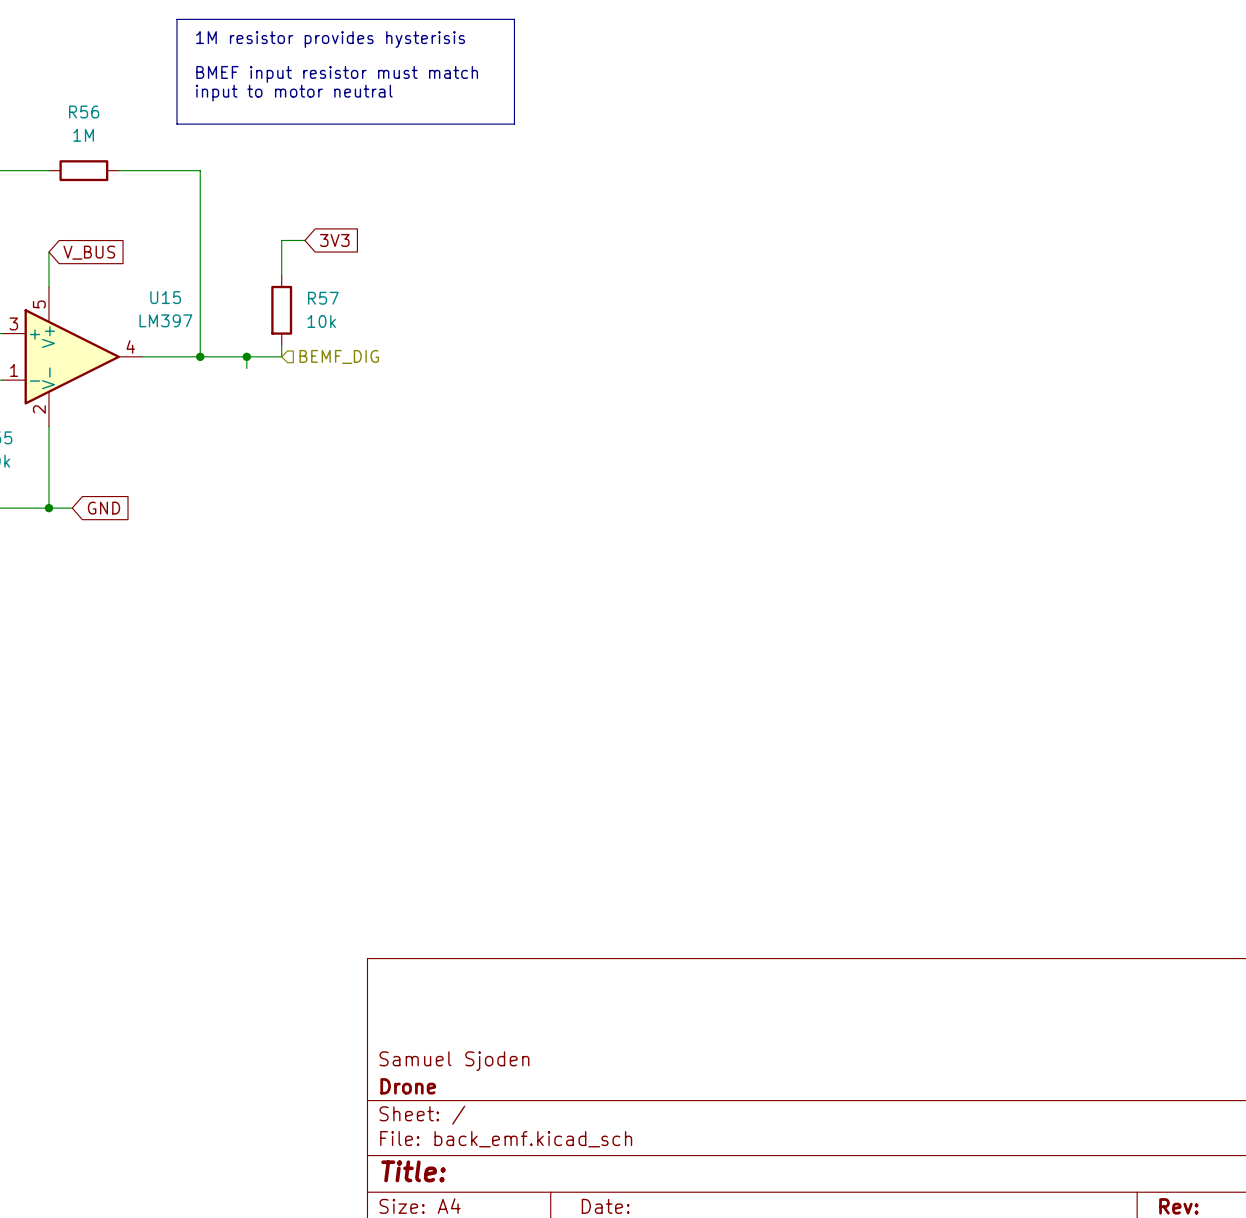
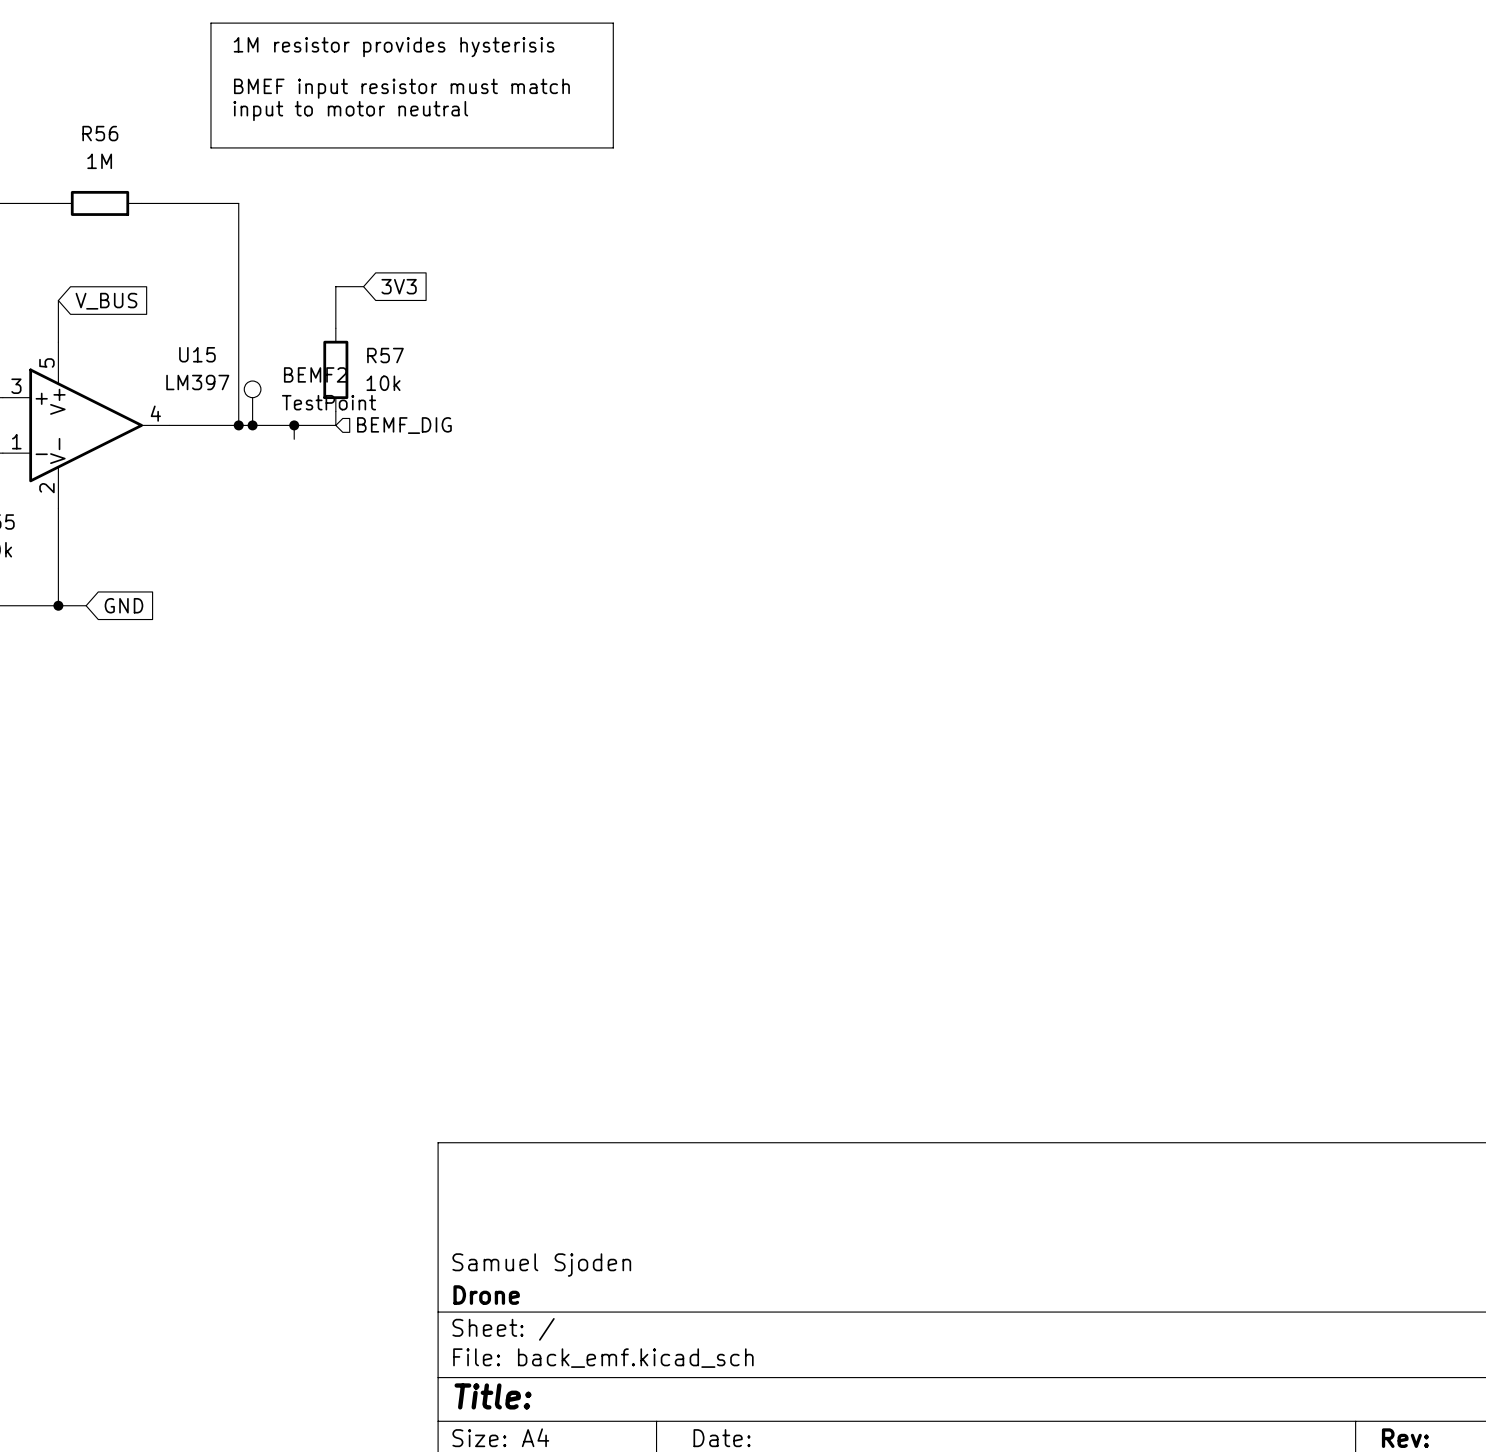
BEMF2: none -> TestPoint (252, 403)
junction: none -> (252, 425)

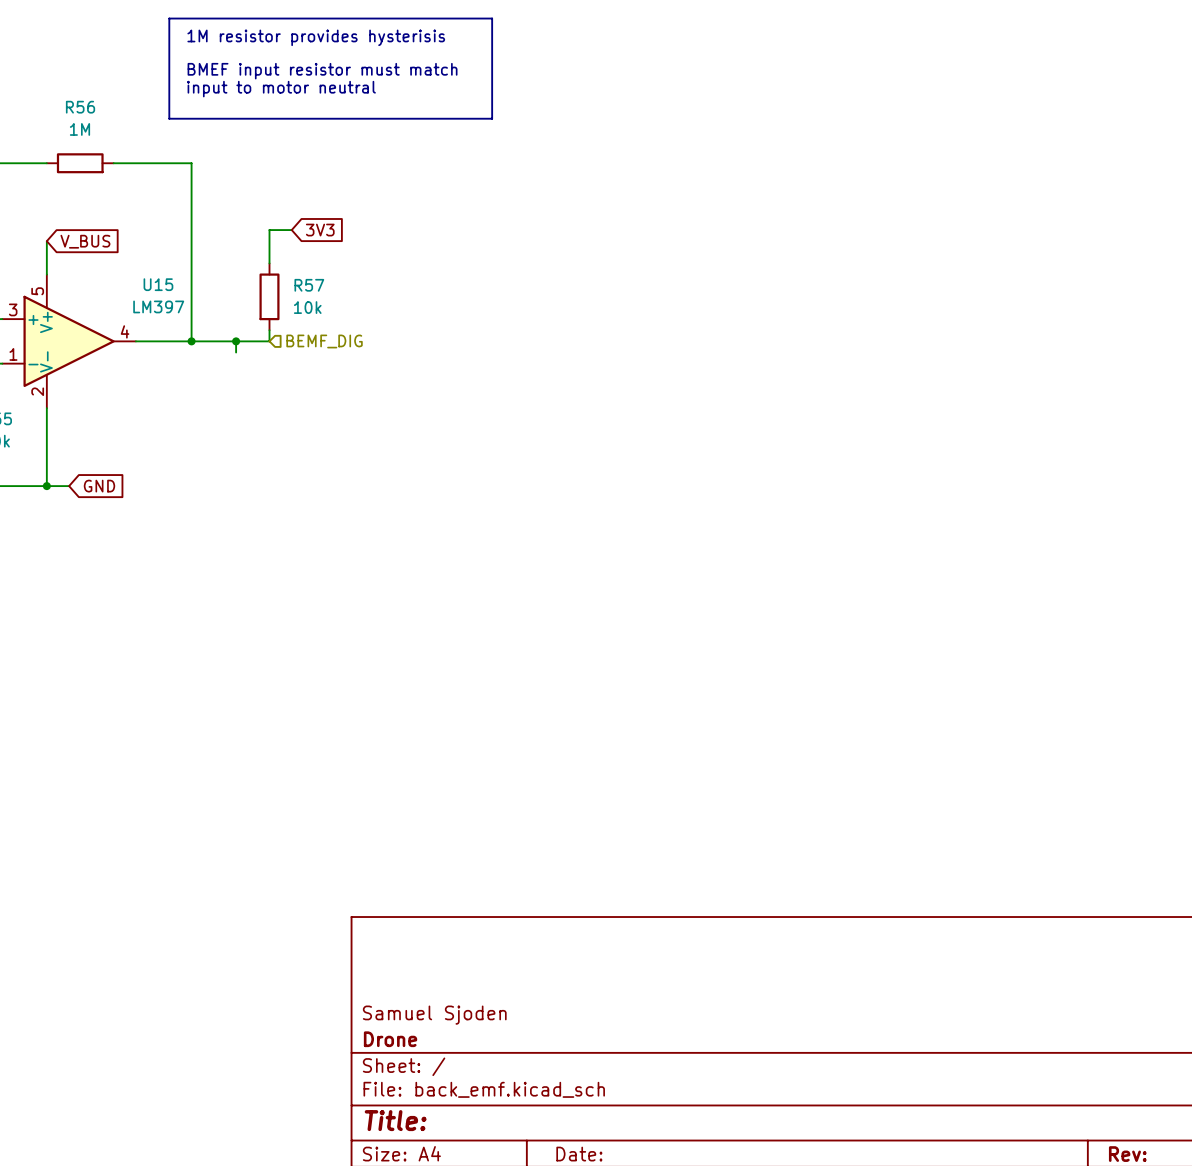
BEMF2: TestPoint (252, 403) -> none
junction: (252, 425) -> none

